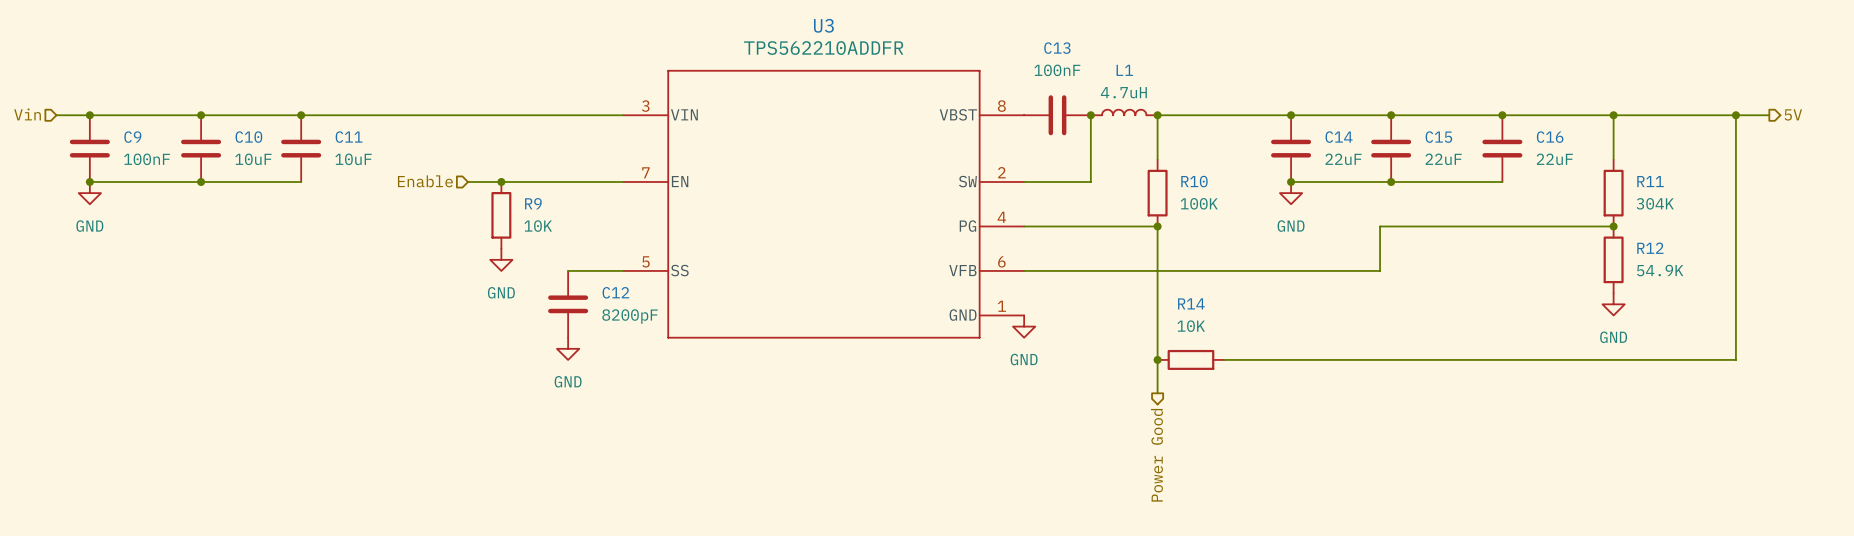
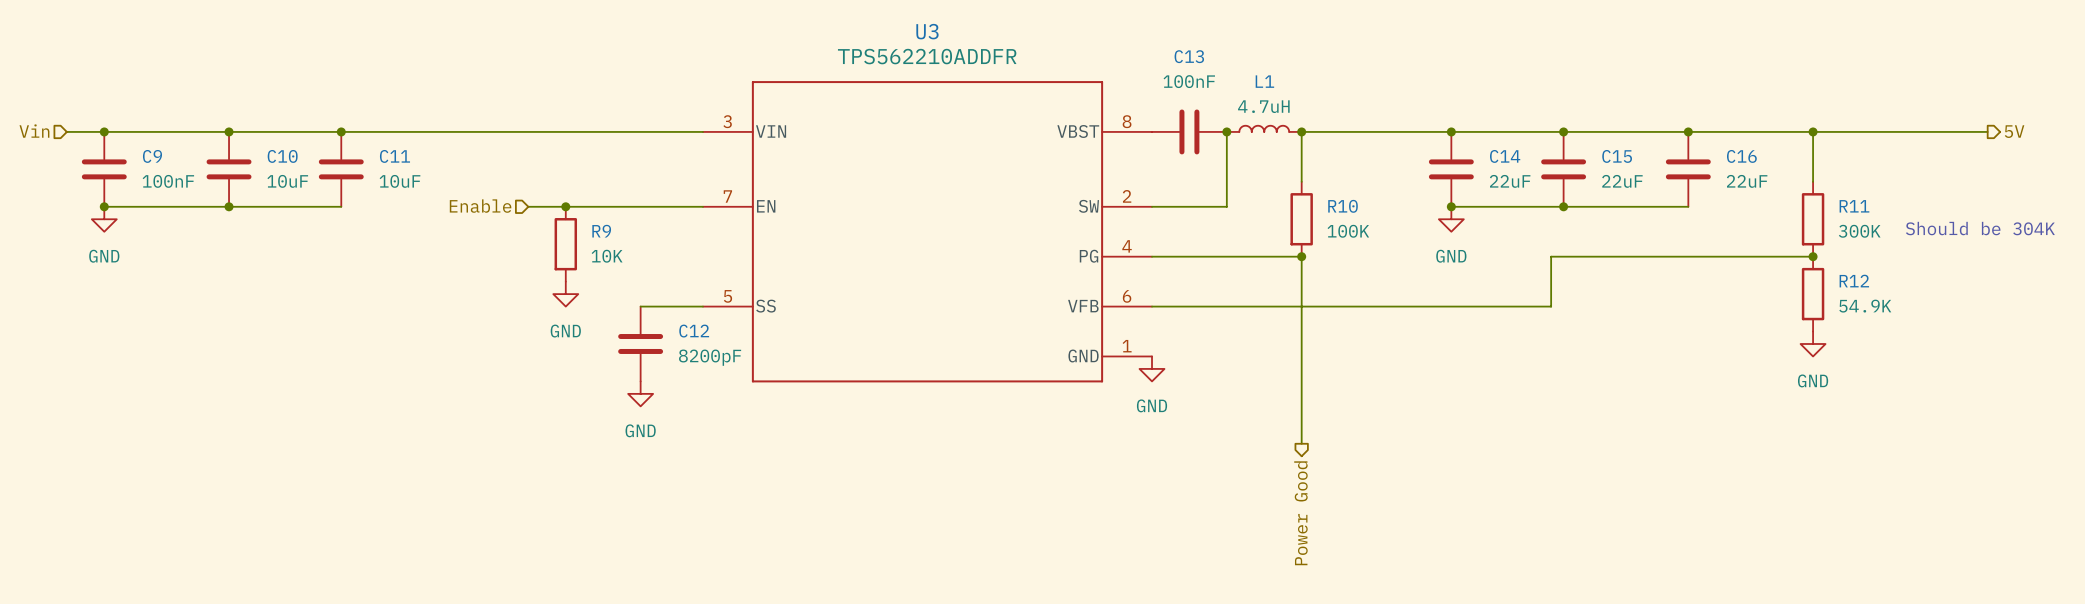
wire: (1735, 115) (1735, 359) (1224, 359) -> none
junction: (1735, 115) -> none
text: none -> Should be 304K (1980, 228)
R11 value: 304K (1655, 203) -> 300K (1859, 231)
junction: (1157, 359) -> none
R14: 10K (1190, 359) -> none

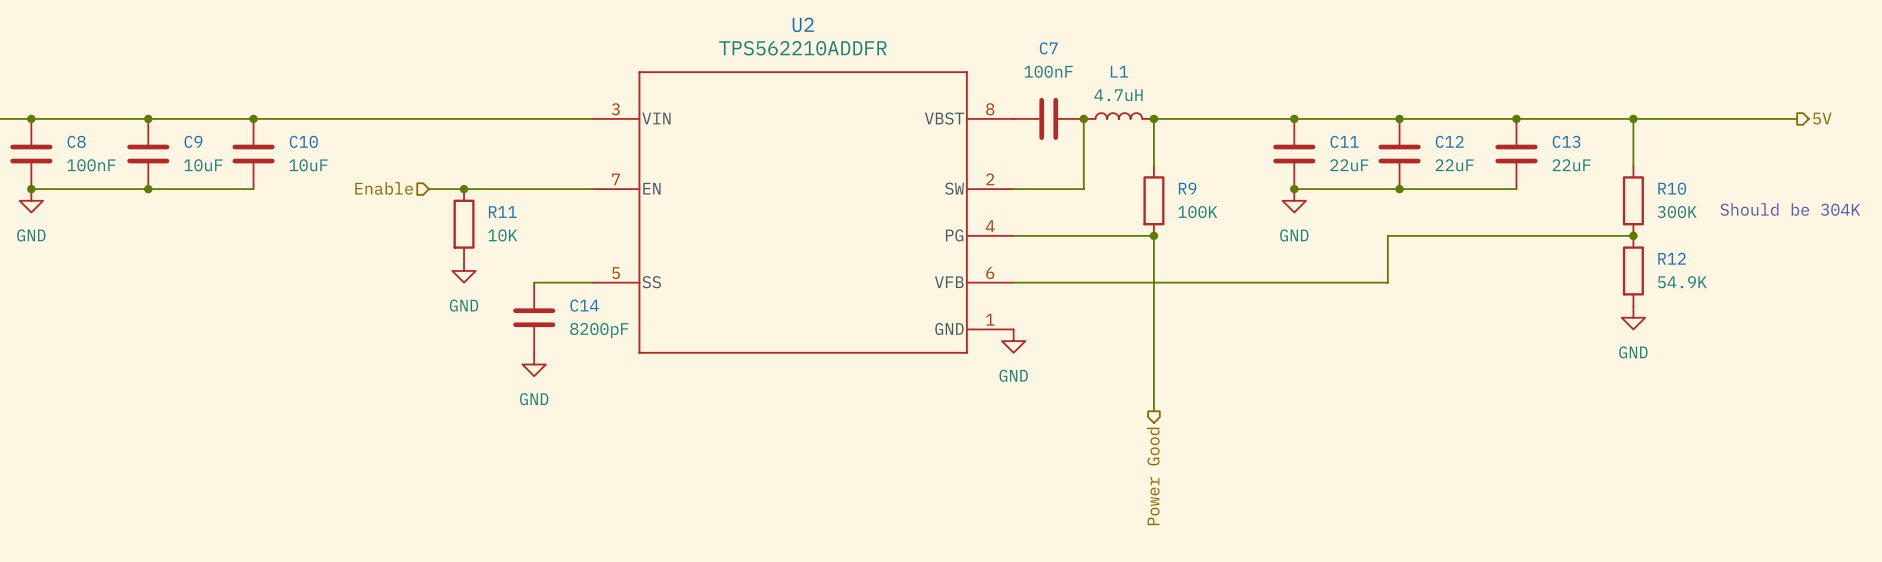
U3 name: U3 (927, 31) -> U2 (803, 24)
C13 name: C13 (1189, 56) -> C7 (1048, 48)
C9 name: C9 (152, 156) -> C8 (76, 141)
C10 name: C10 (282, 156) -> C9 (193, 141)
C11 name: C11 (394, 156) -> C10 (303, 141)
C14 name: C14 (1505, 156) -> C11 (1344, 141)
C15 name: C15 (1617, 156) -> C12 (1449, 141)
C16 name: C16 (1741, 156) -> C13 (1566, 141)
R10 name: R10 (1343, 206) -> R9 (1187, 188)
R11 name: R11 (1854, 206) -> R10 (1672, 188)
R9 name: R9 (601, 231) -> R11 (502, 212)
C12 name: C12 (694, 331) -> C14 (584, 305)

